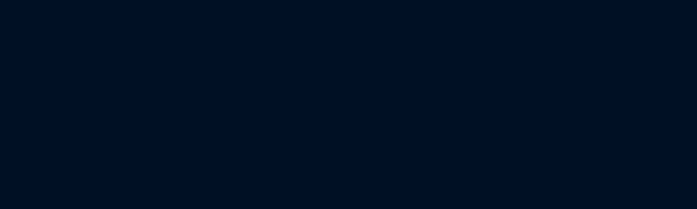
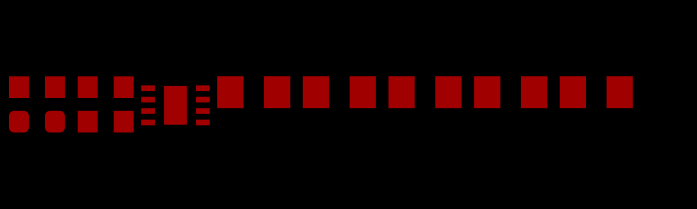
part: none -> (36, 87)
part: none -> (105, 87)
part: none -> (253, 92)
part: none -> (339, 92)
part: none -> (424, 92)
part: none -> (510, 92)
part: none -> (596, 92)
part: none -> (175, 105)
part: none -> (36, 121)
part: none -> (105, 121)

